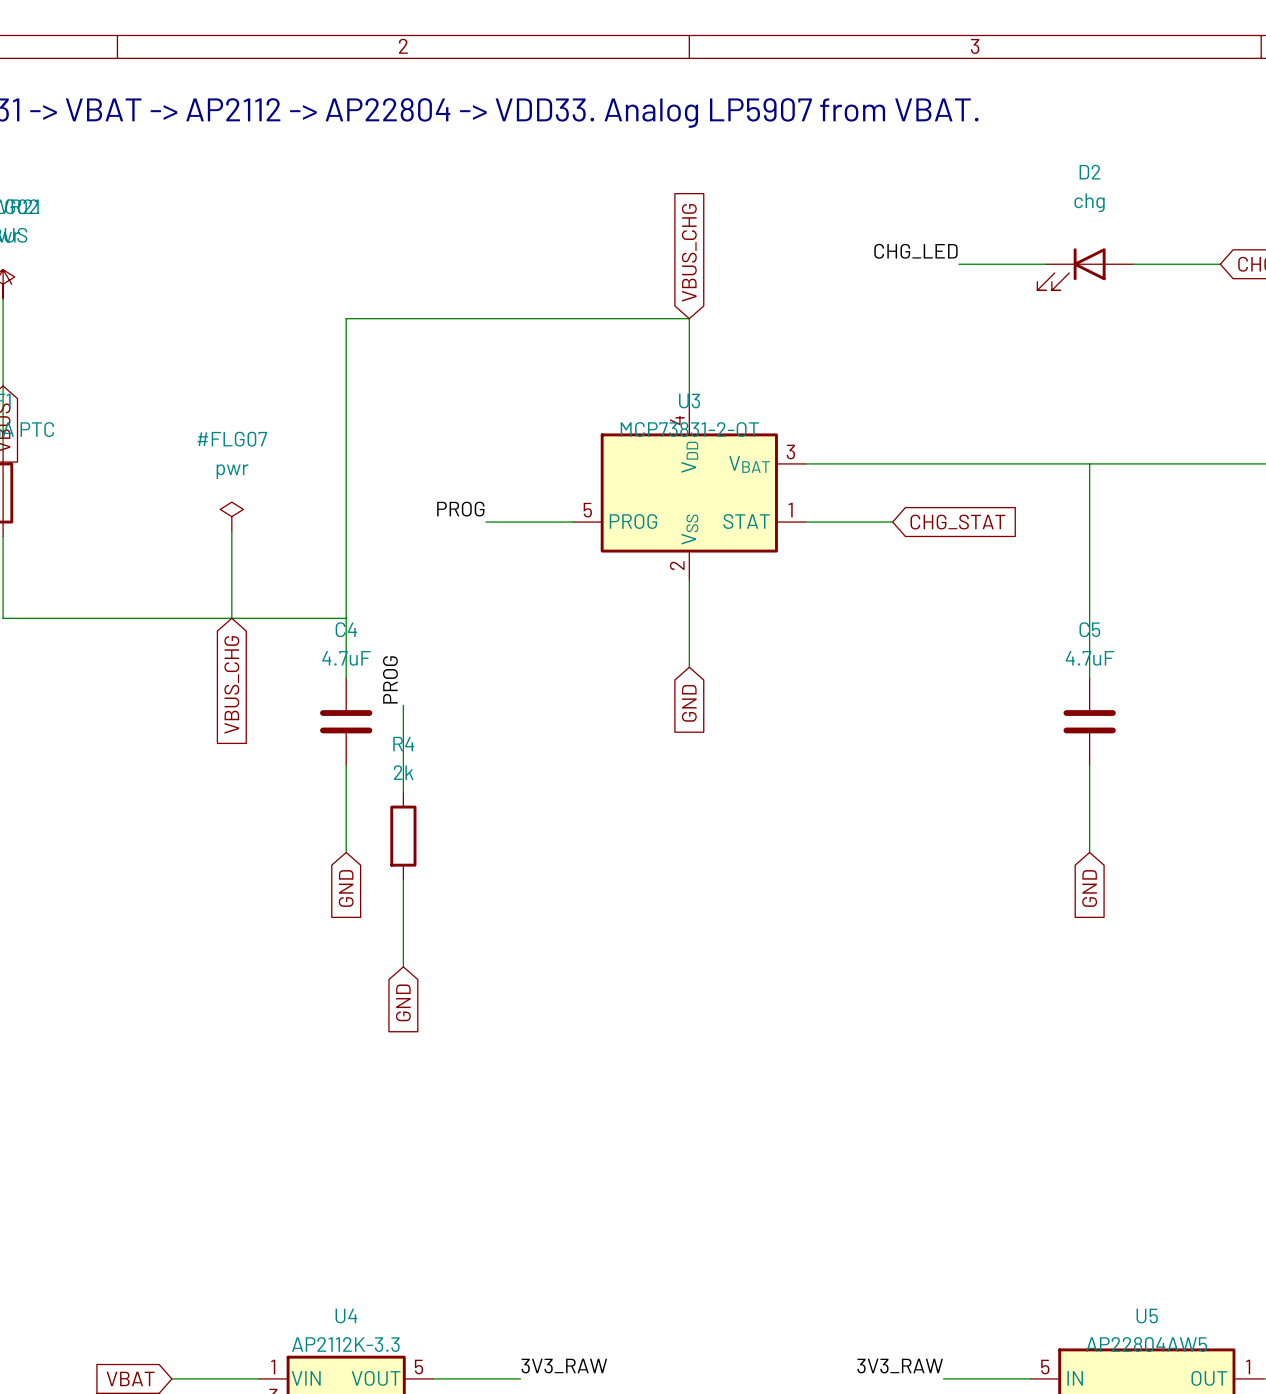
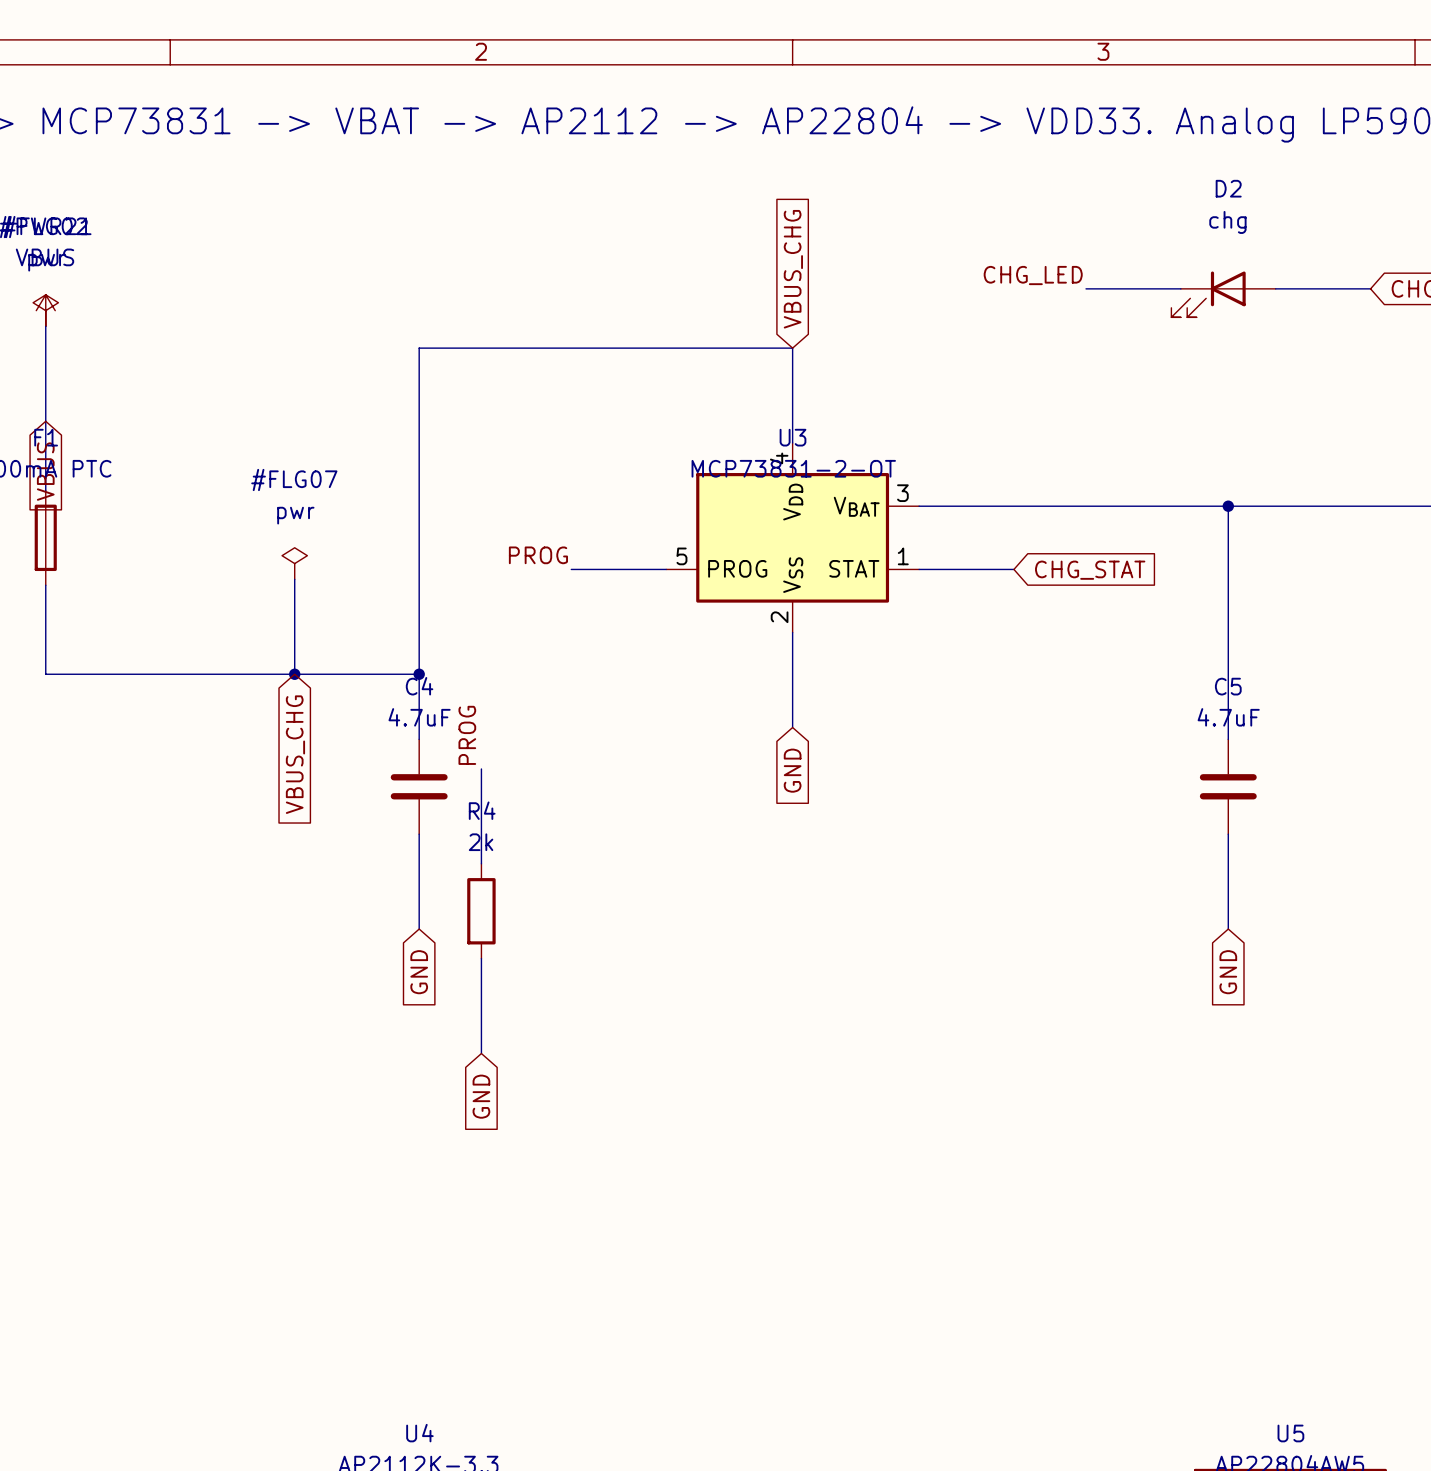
junction: none -> (1228, 506)
junction: none -> (294, 674)
junction: none -> (419, 674)

